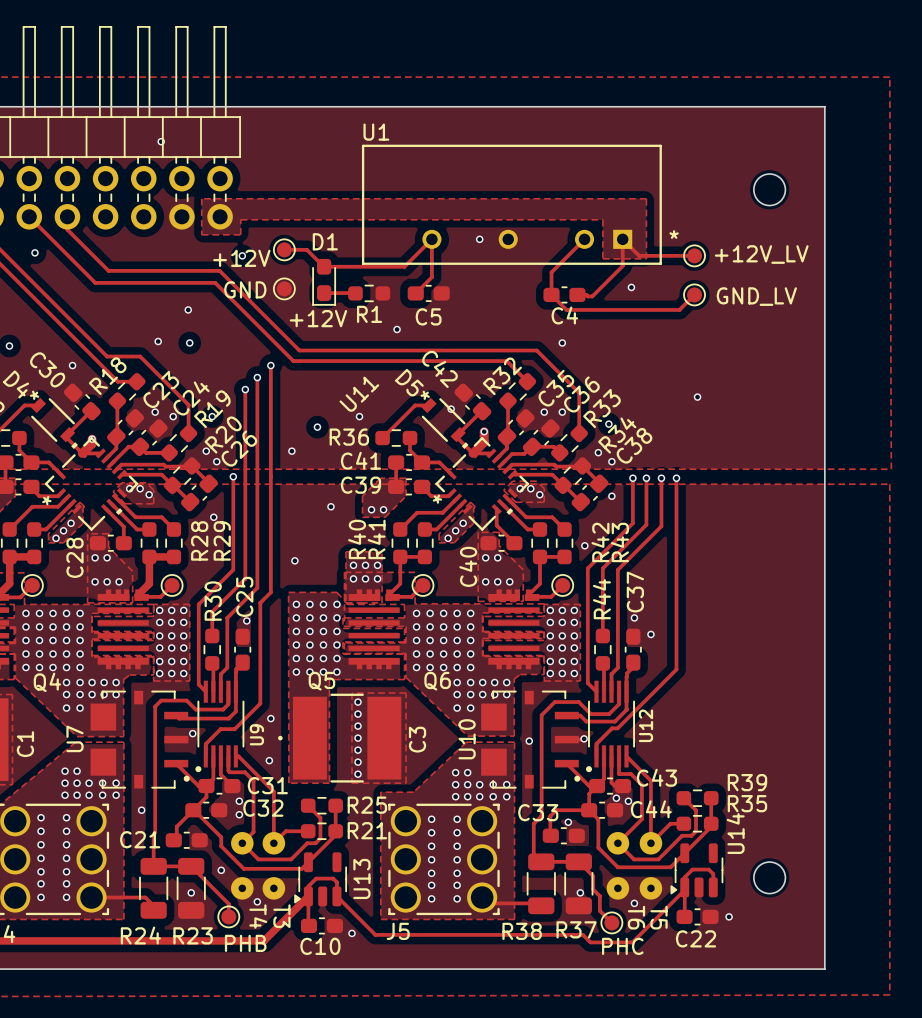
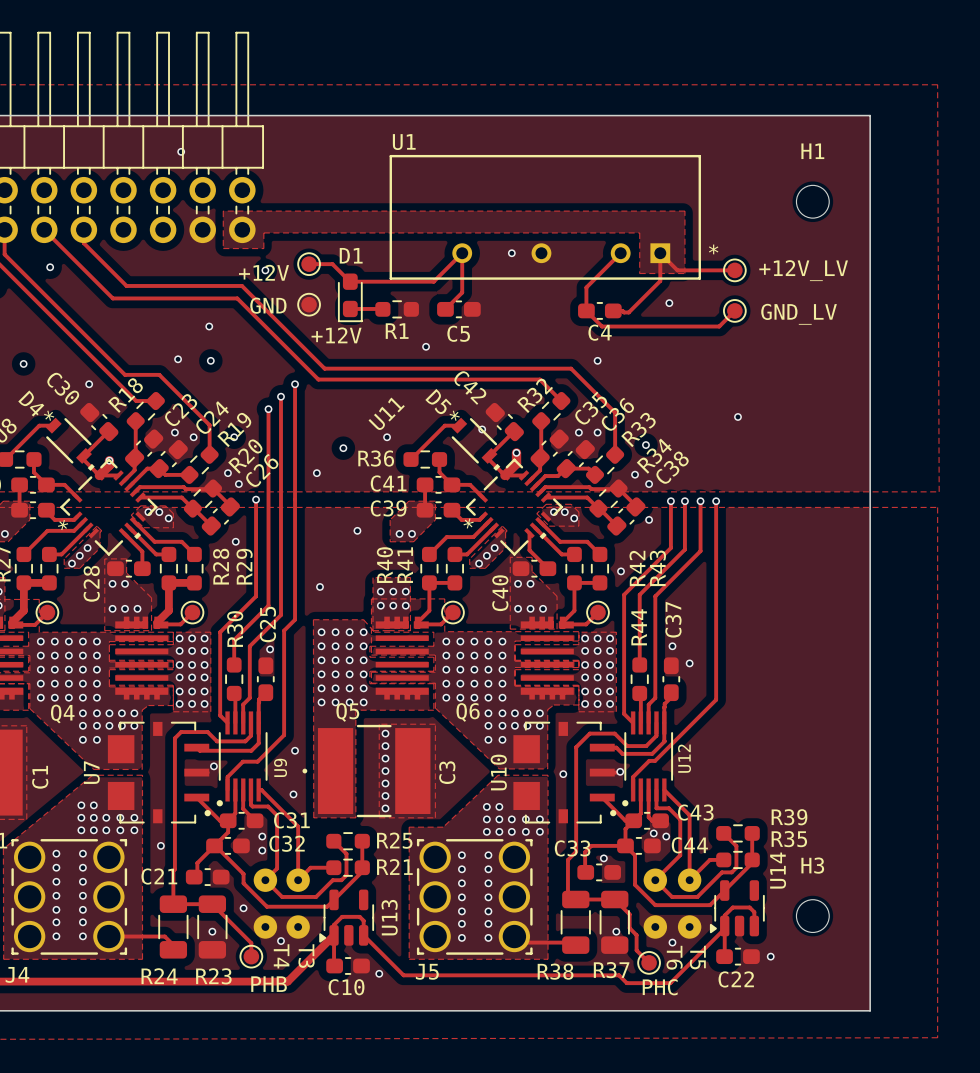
H1 name: none -> H1 (812, 151)
H3 name: none -> H3 (812, 865)

